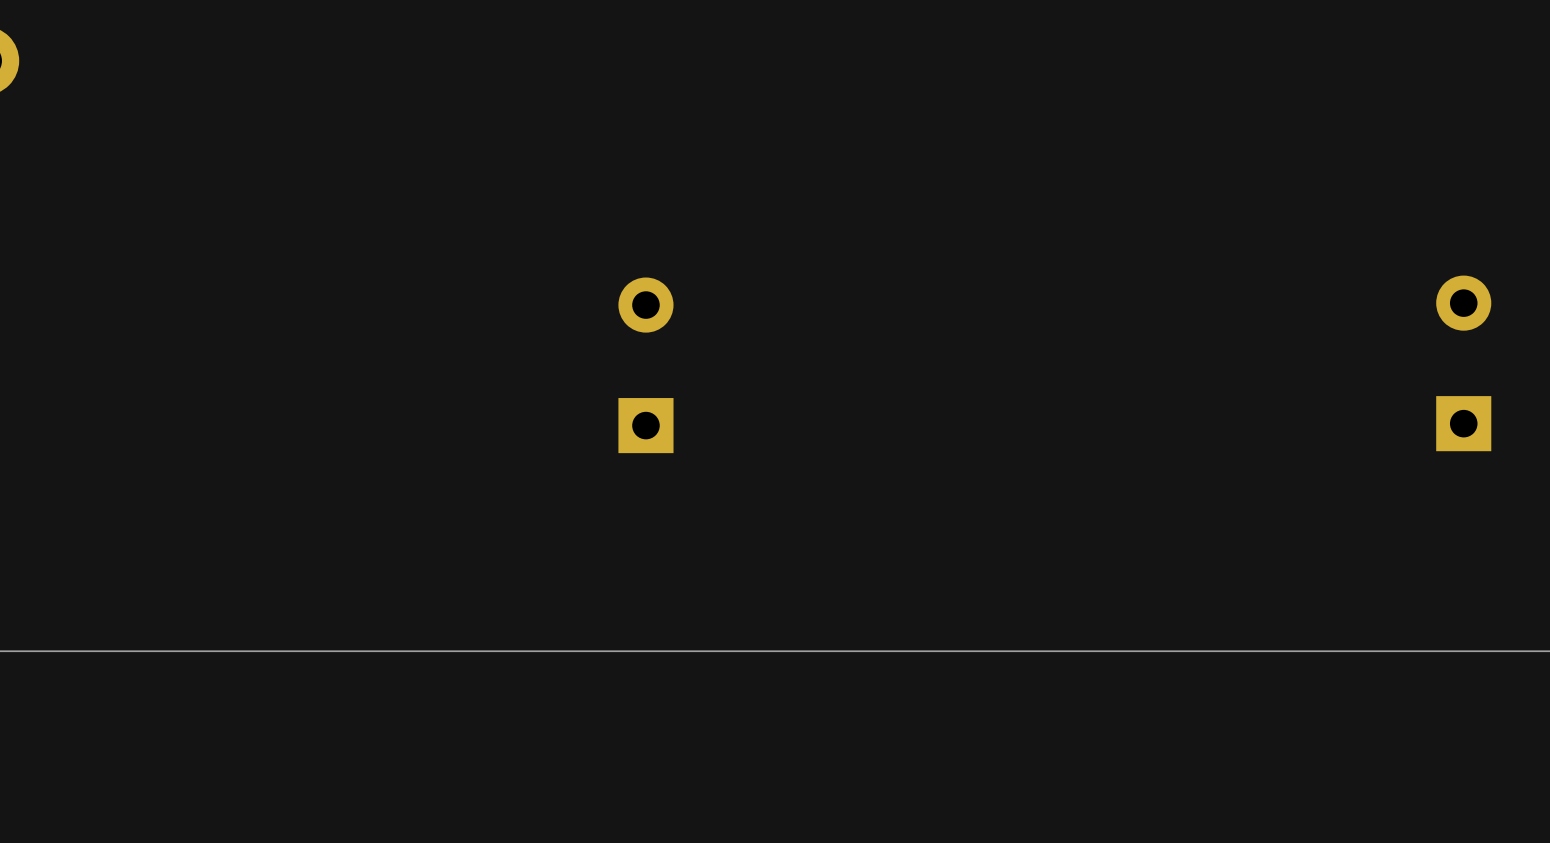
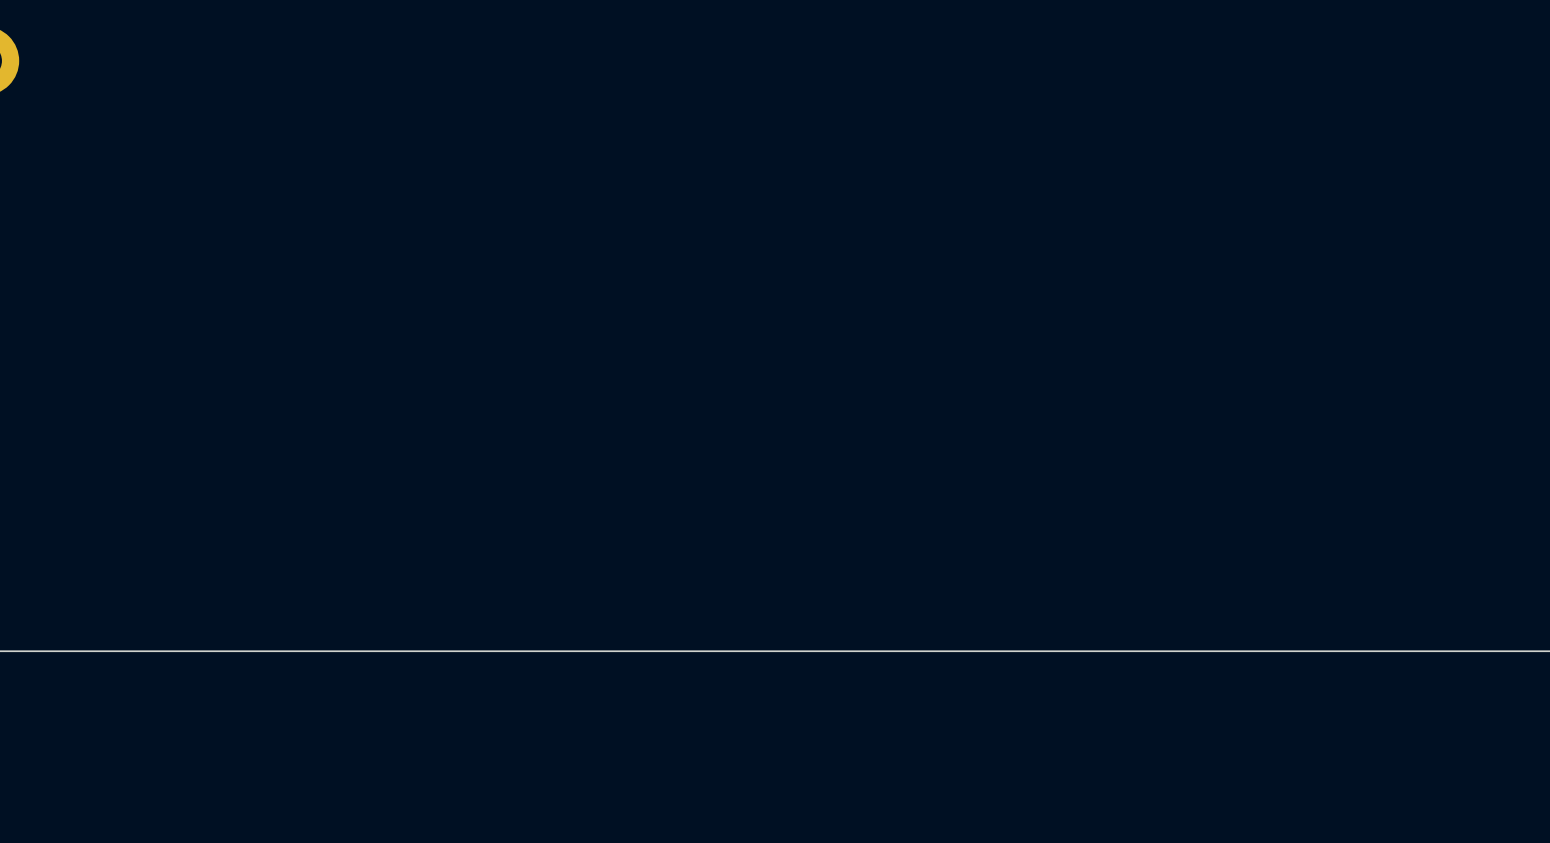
part: (1463, 363) -> none
part: (645, 365) -> none

